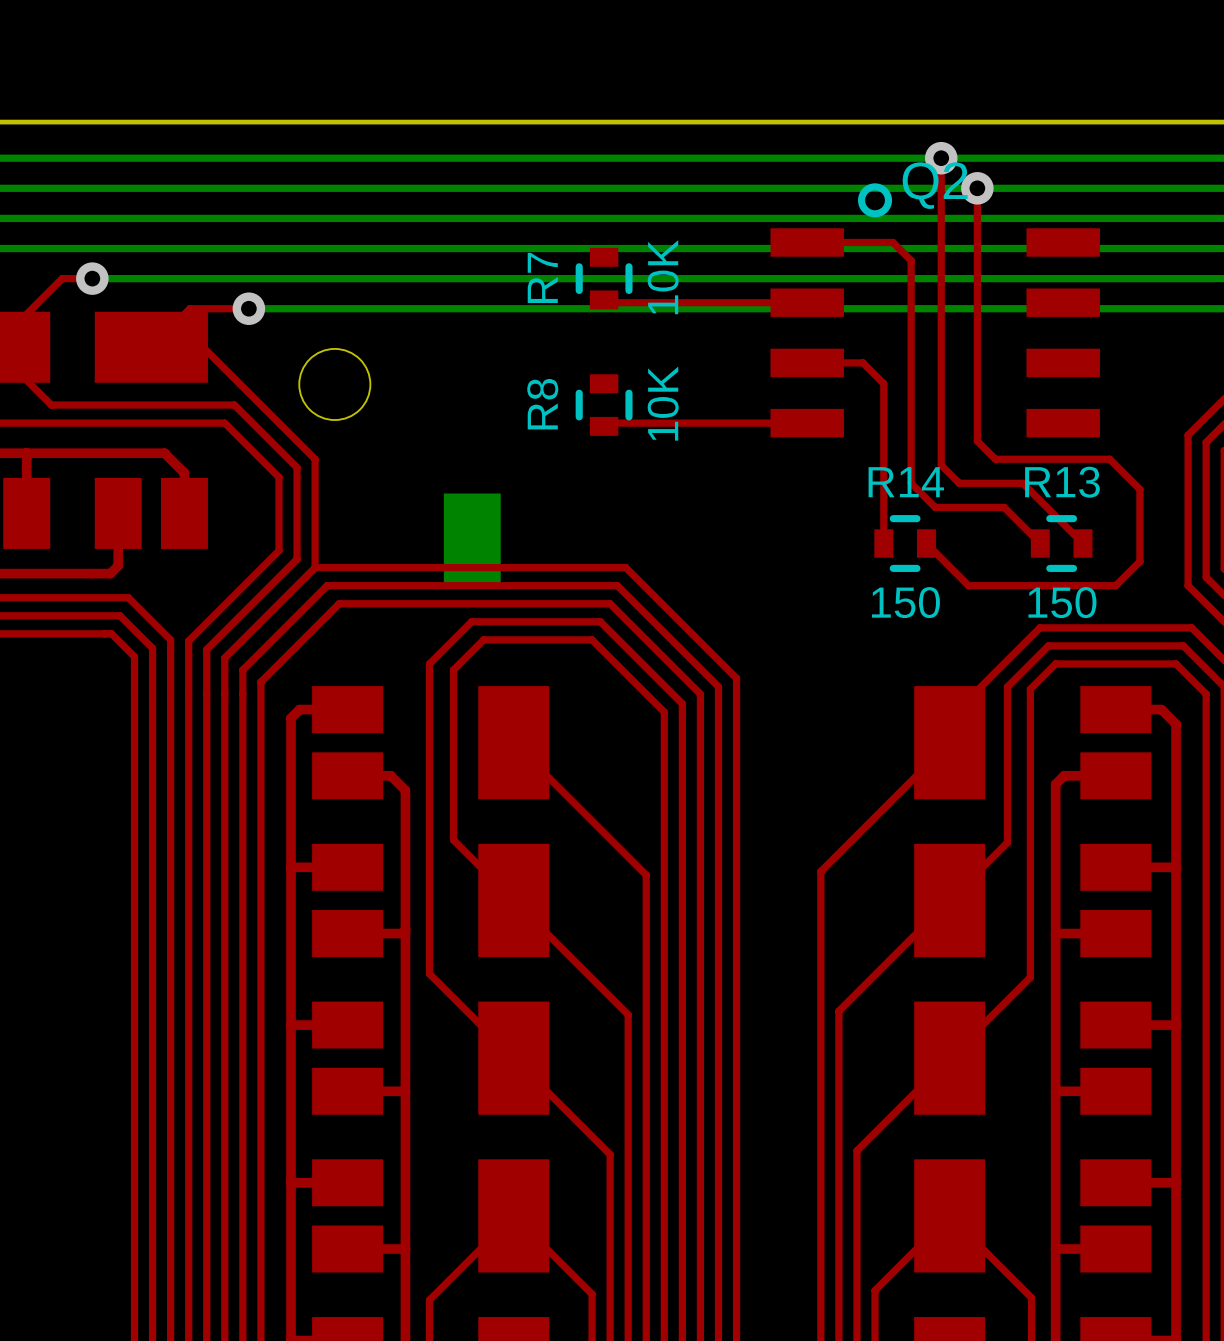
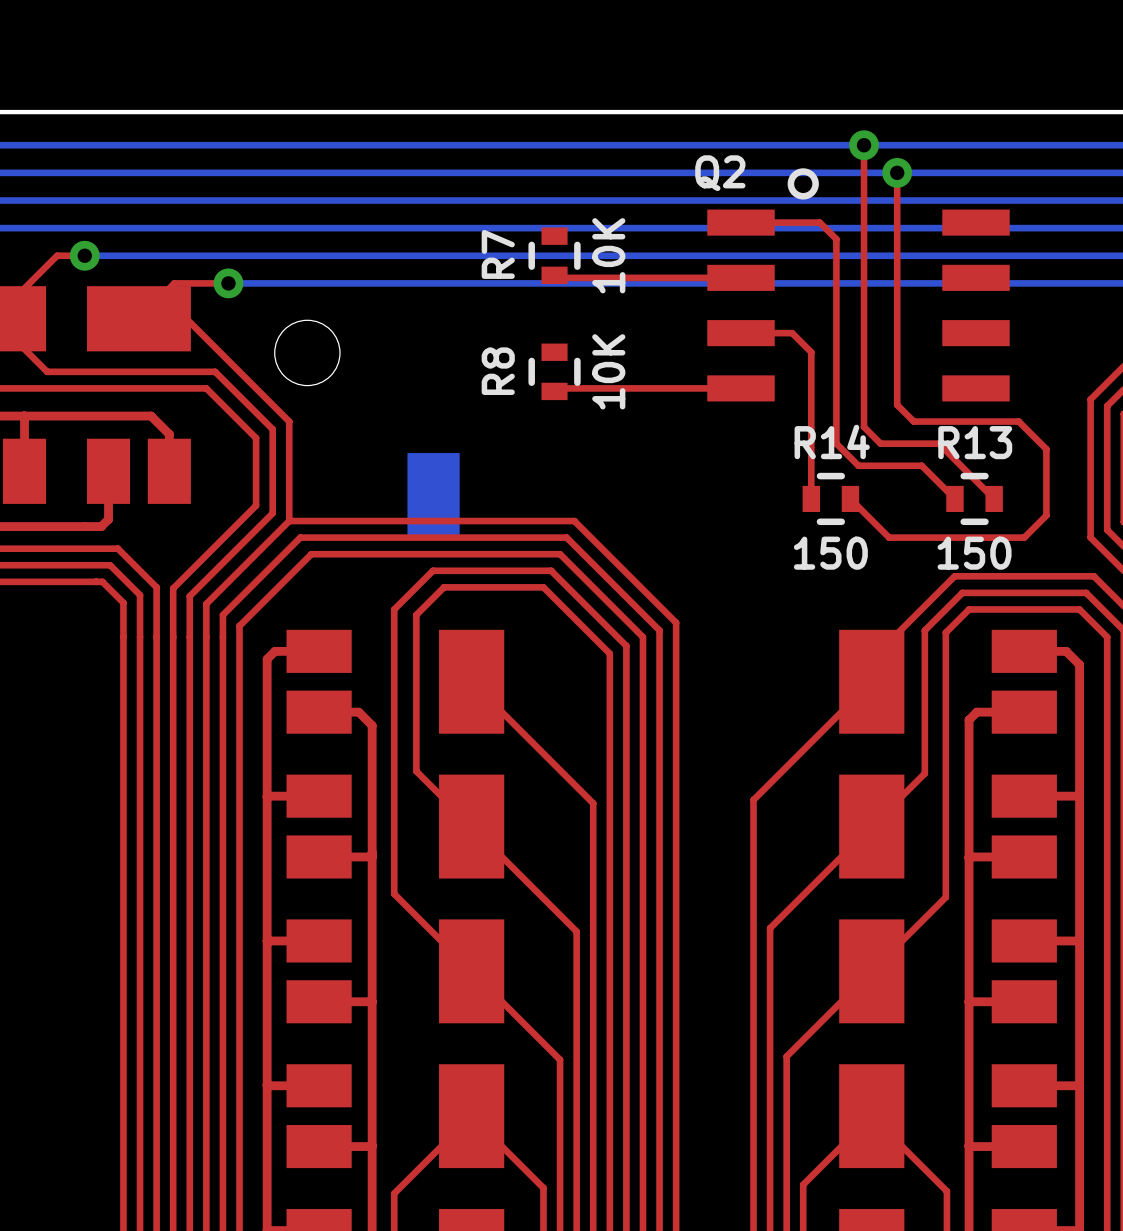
Q2 name position: Q2 (935, 185) -> Q2 (720, 173)

